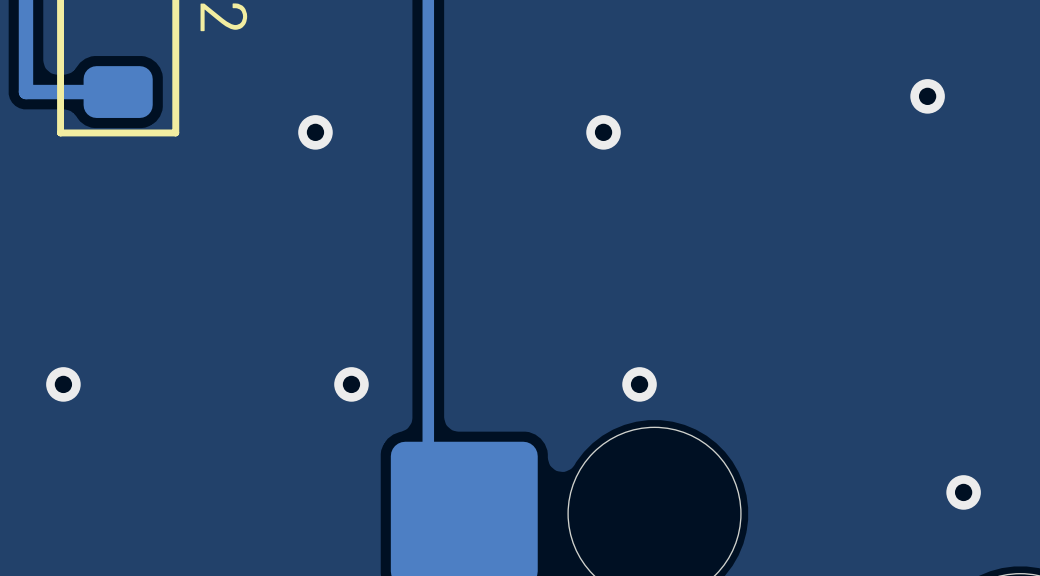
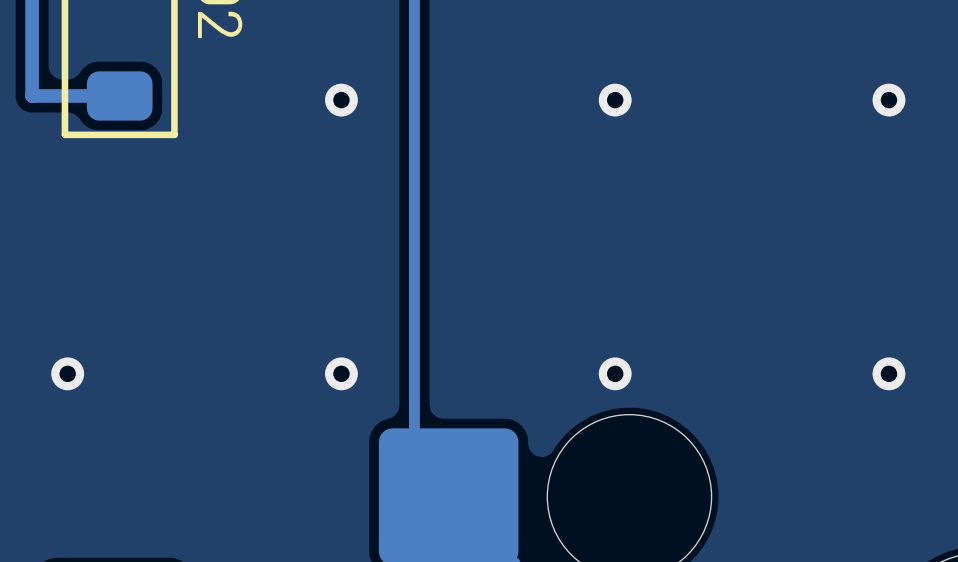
via position: (315, 132) -> (341, 100)
via position: (603, 132) -> (615, 100)
via: none -> (888, 373)
via: (963, 492) -> none

